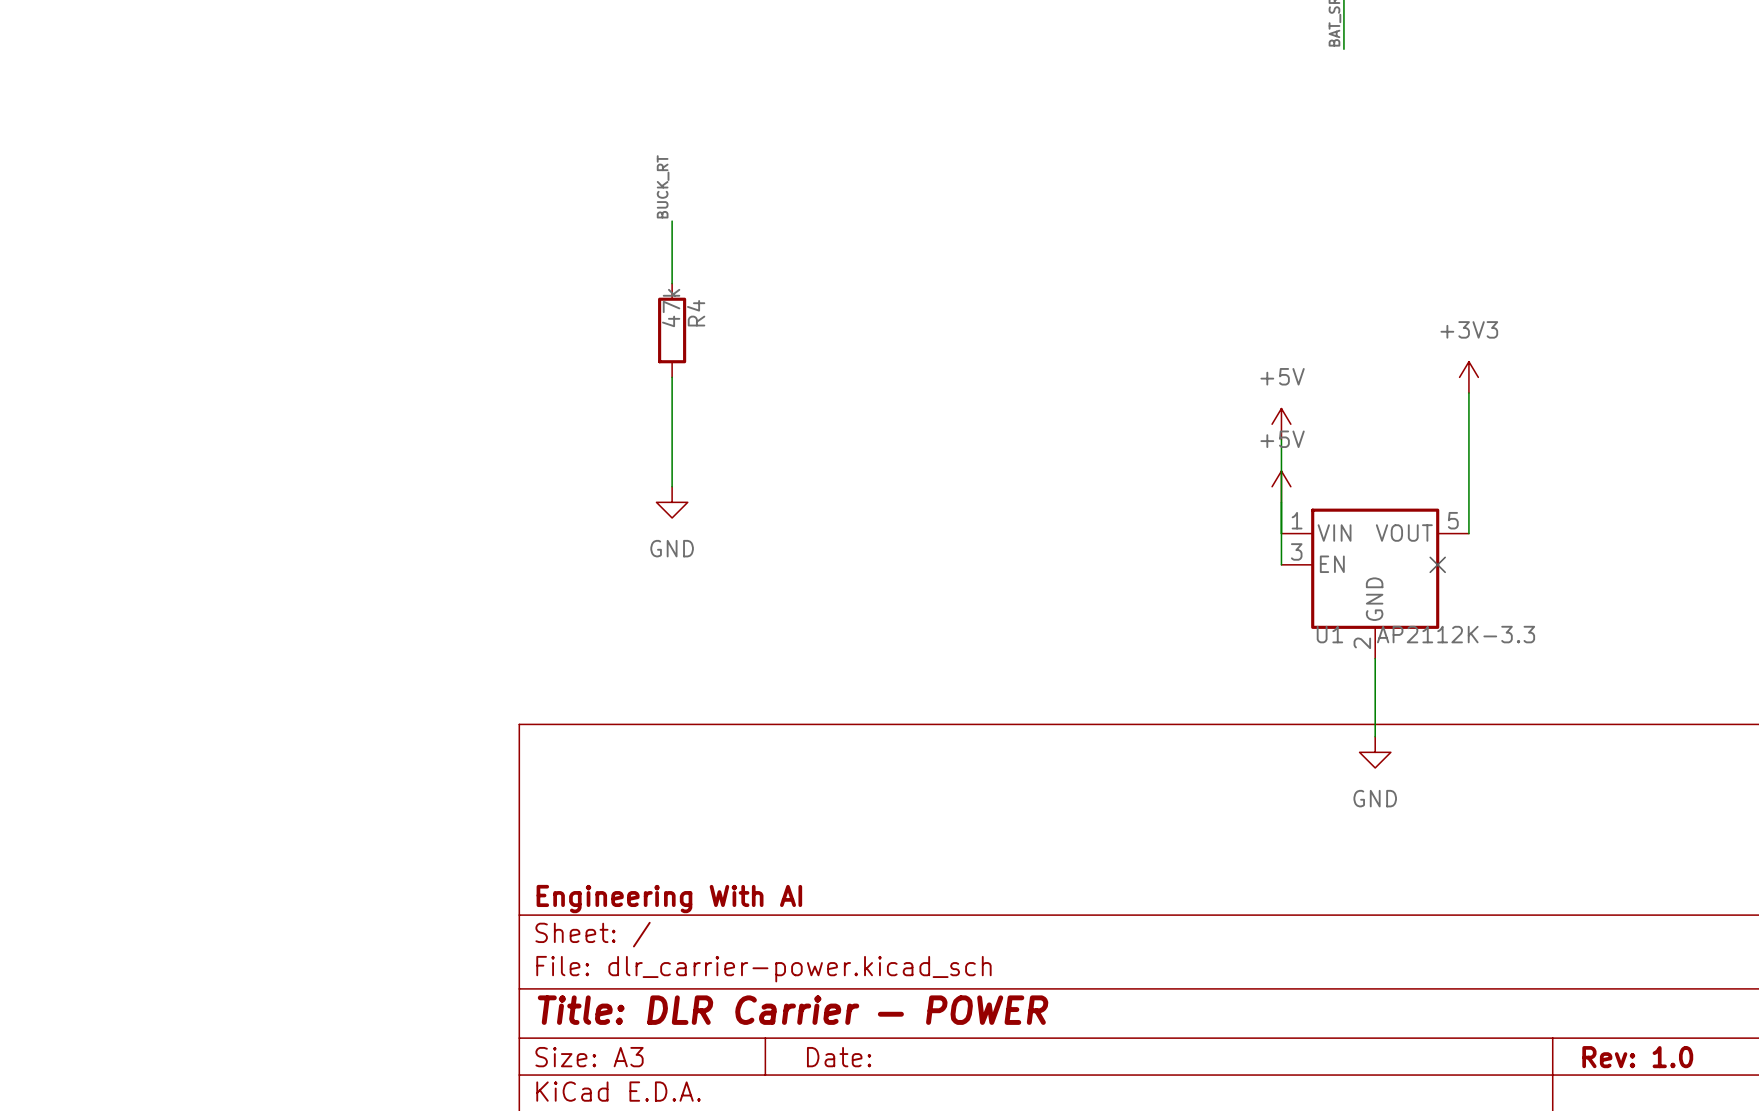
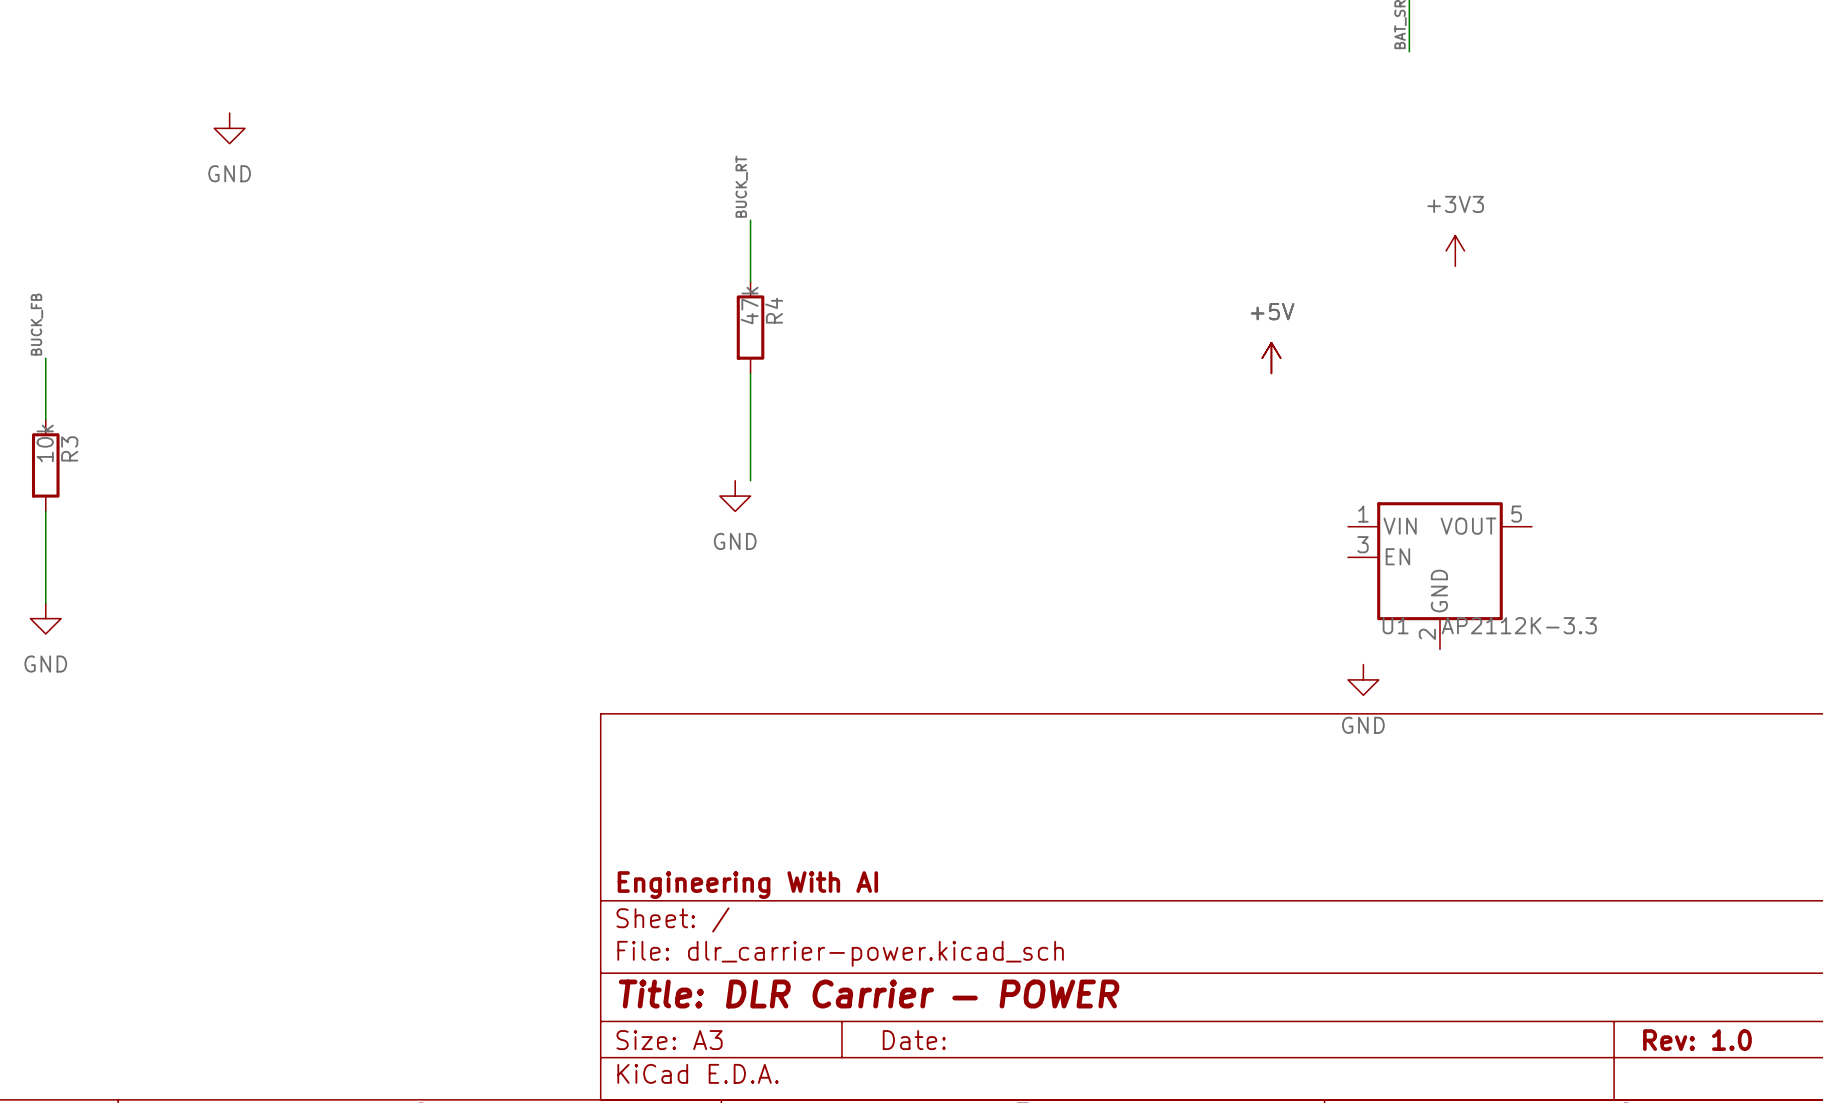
power symbol: none -> GND (229, 128)
power symbol: none -> +5V (1271, 358)
power symbol position: +3V3 (1468, 377) -> +3V3 (1455, 250)
wire: (1468, 392) (1468, 533) -> none
power symbol: +5V (1281, 424) -> none
wire: (1281, 439) (1281, 564) -> none
power symbol: +5V (1281, 486) -> none
power symbol position: GND (672, 502) -> GND (735, 496)
no-connect mark: (1437, 564) -> none
wire: (1375, 658) (1375, 736) -> none
power symbol position: GND (1375, 752) -> GND (1363, 679)

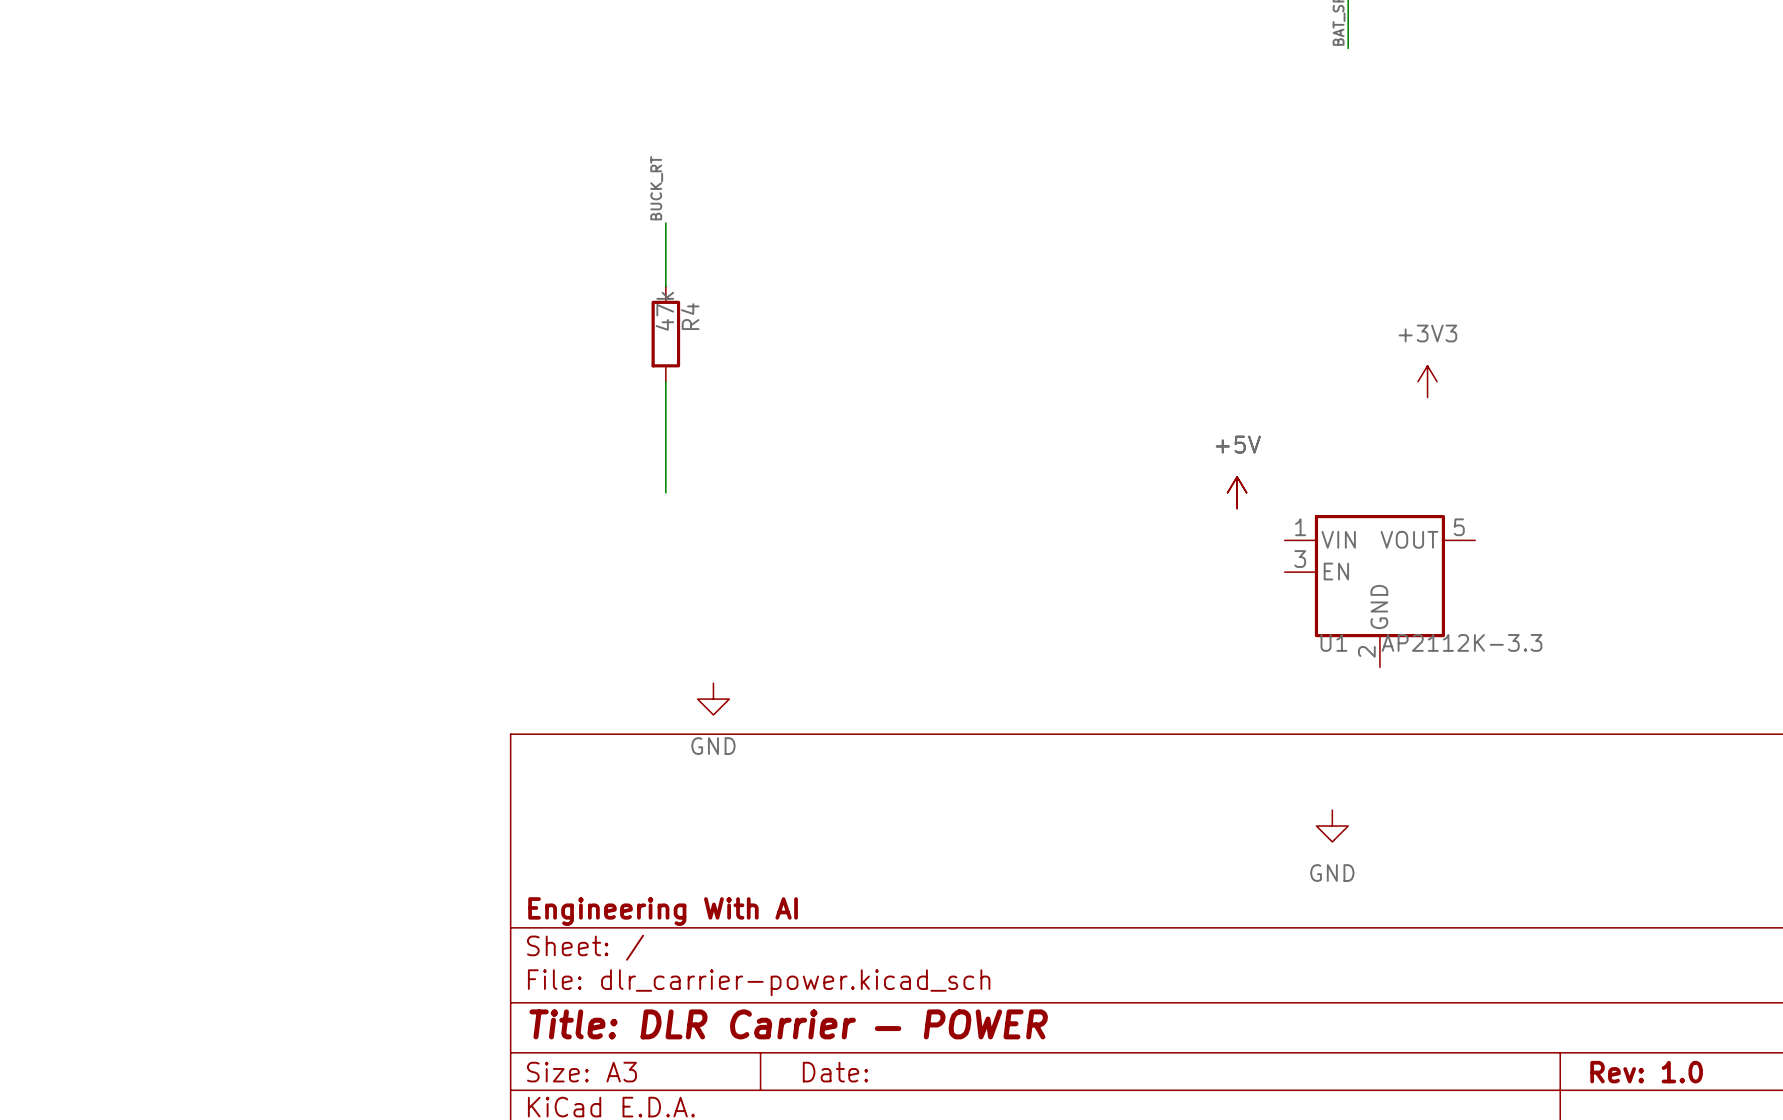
power symbol: GND (229, 128) -> none
power symbol position: +3V3 (1455, 250) -> +3V3 (1427, 381)
power symbol position: +5V (1271, 358) -> +5V (1237, 492)
power symbol position: GND (735, 496) -> GND (713, 699)
power symbol position: GND (1363, 679) -> GND (1332, 826)

